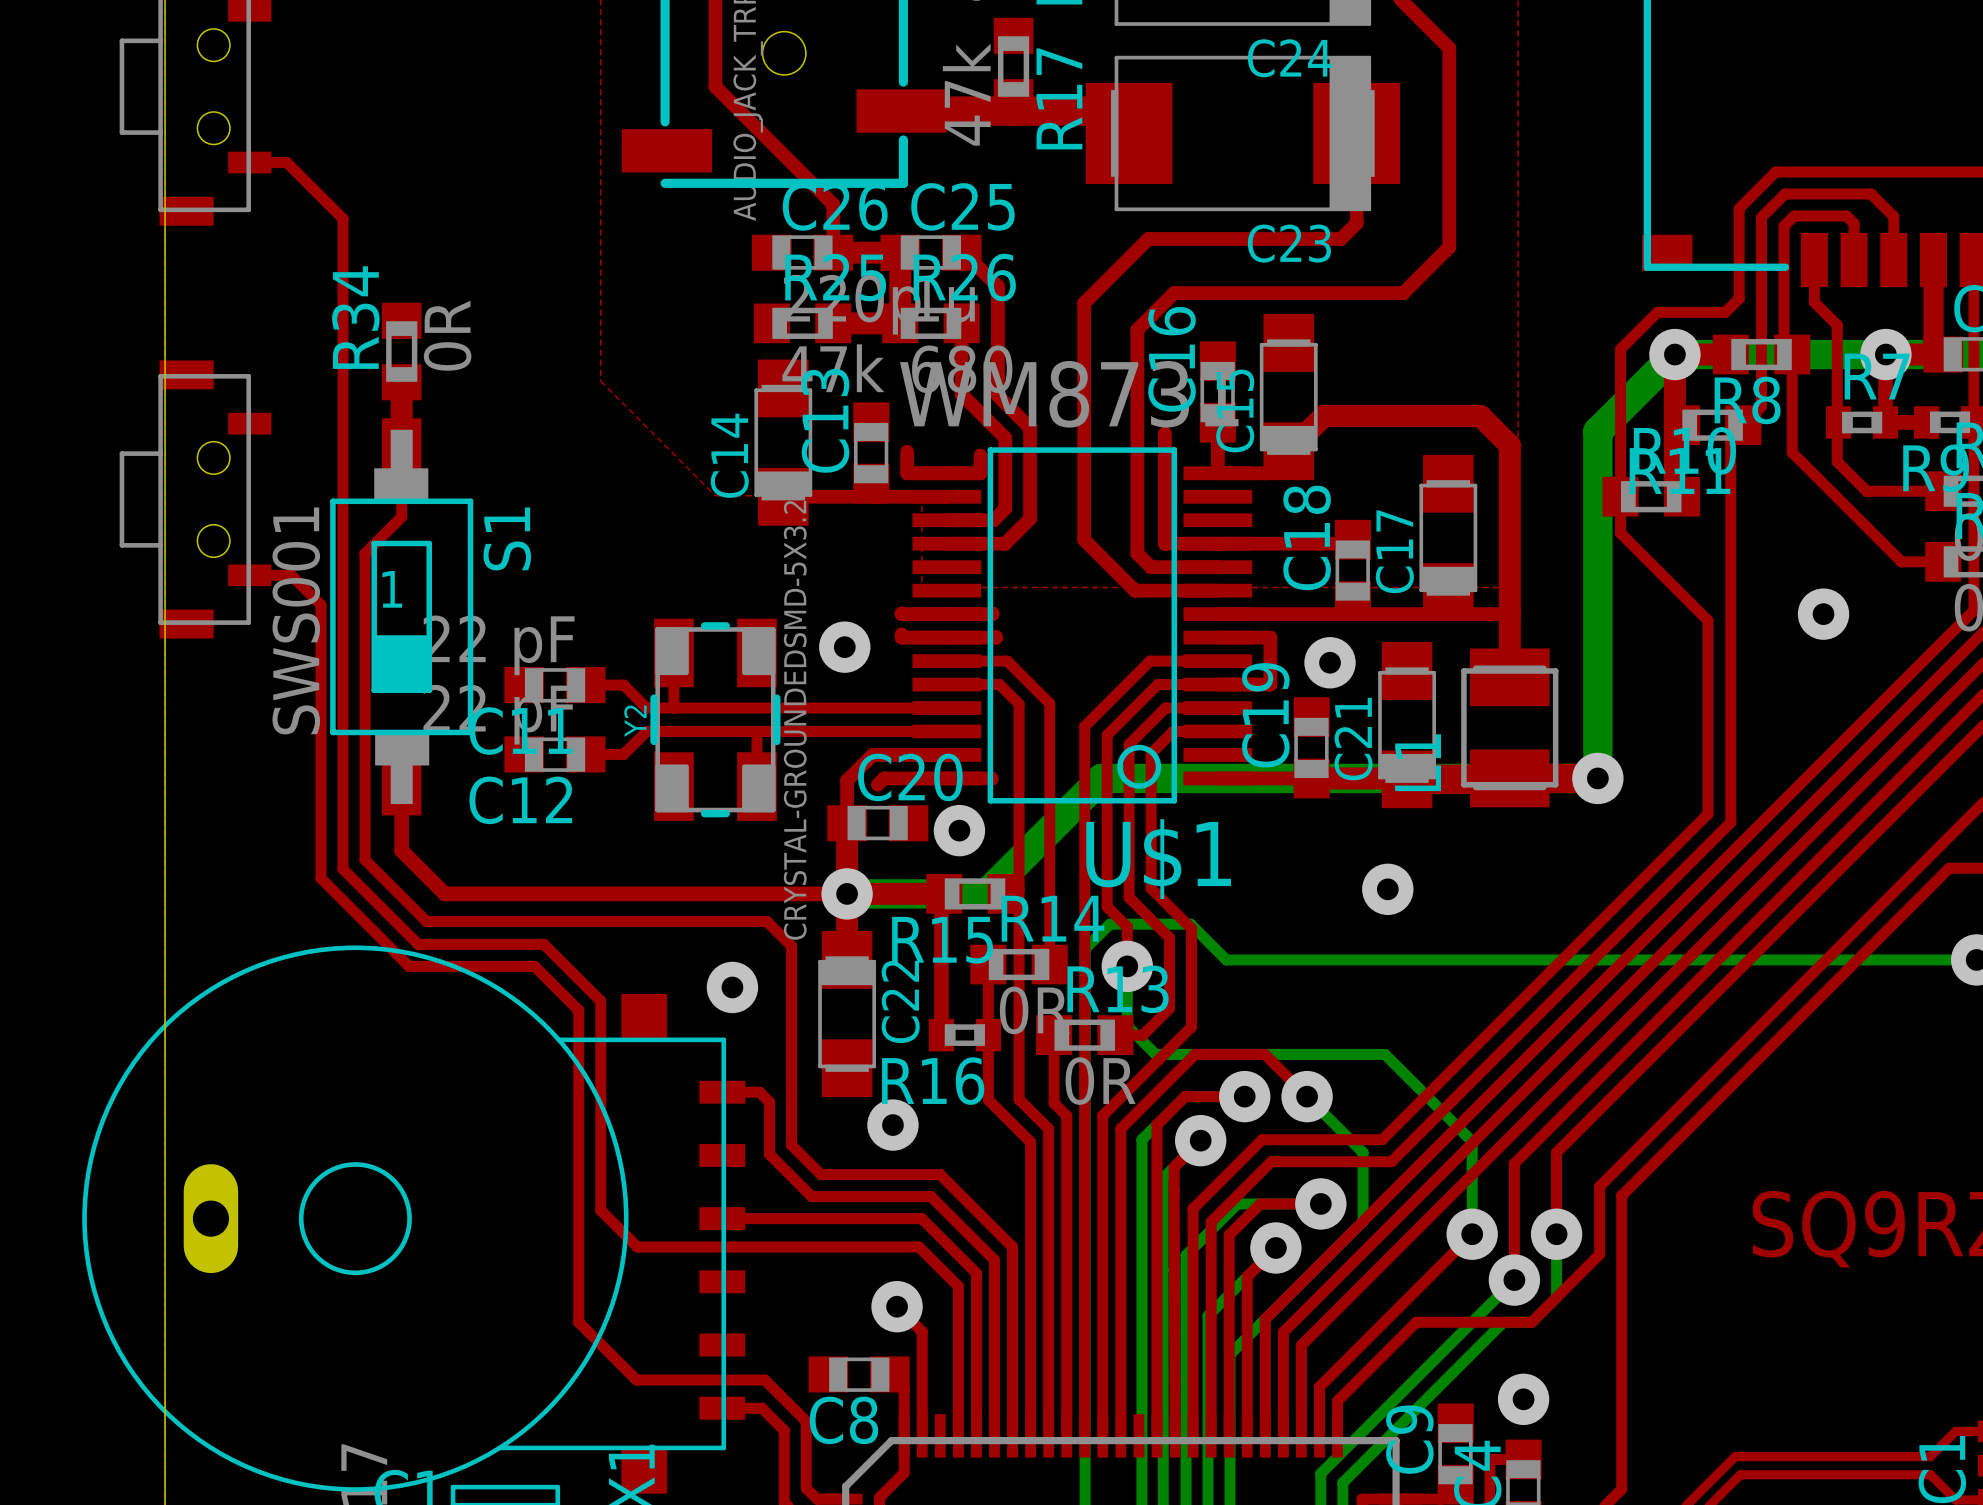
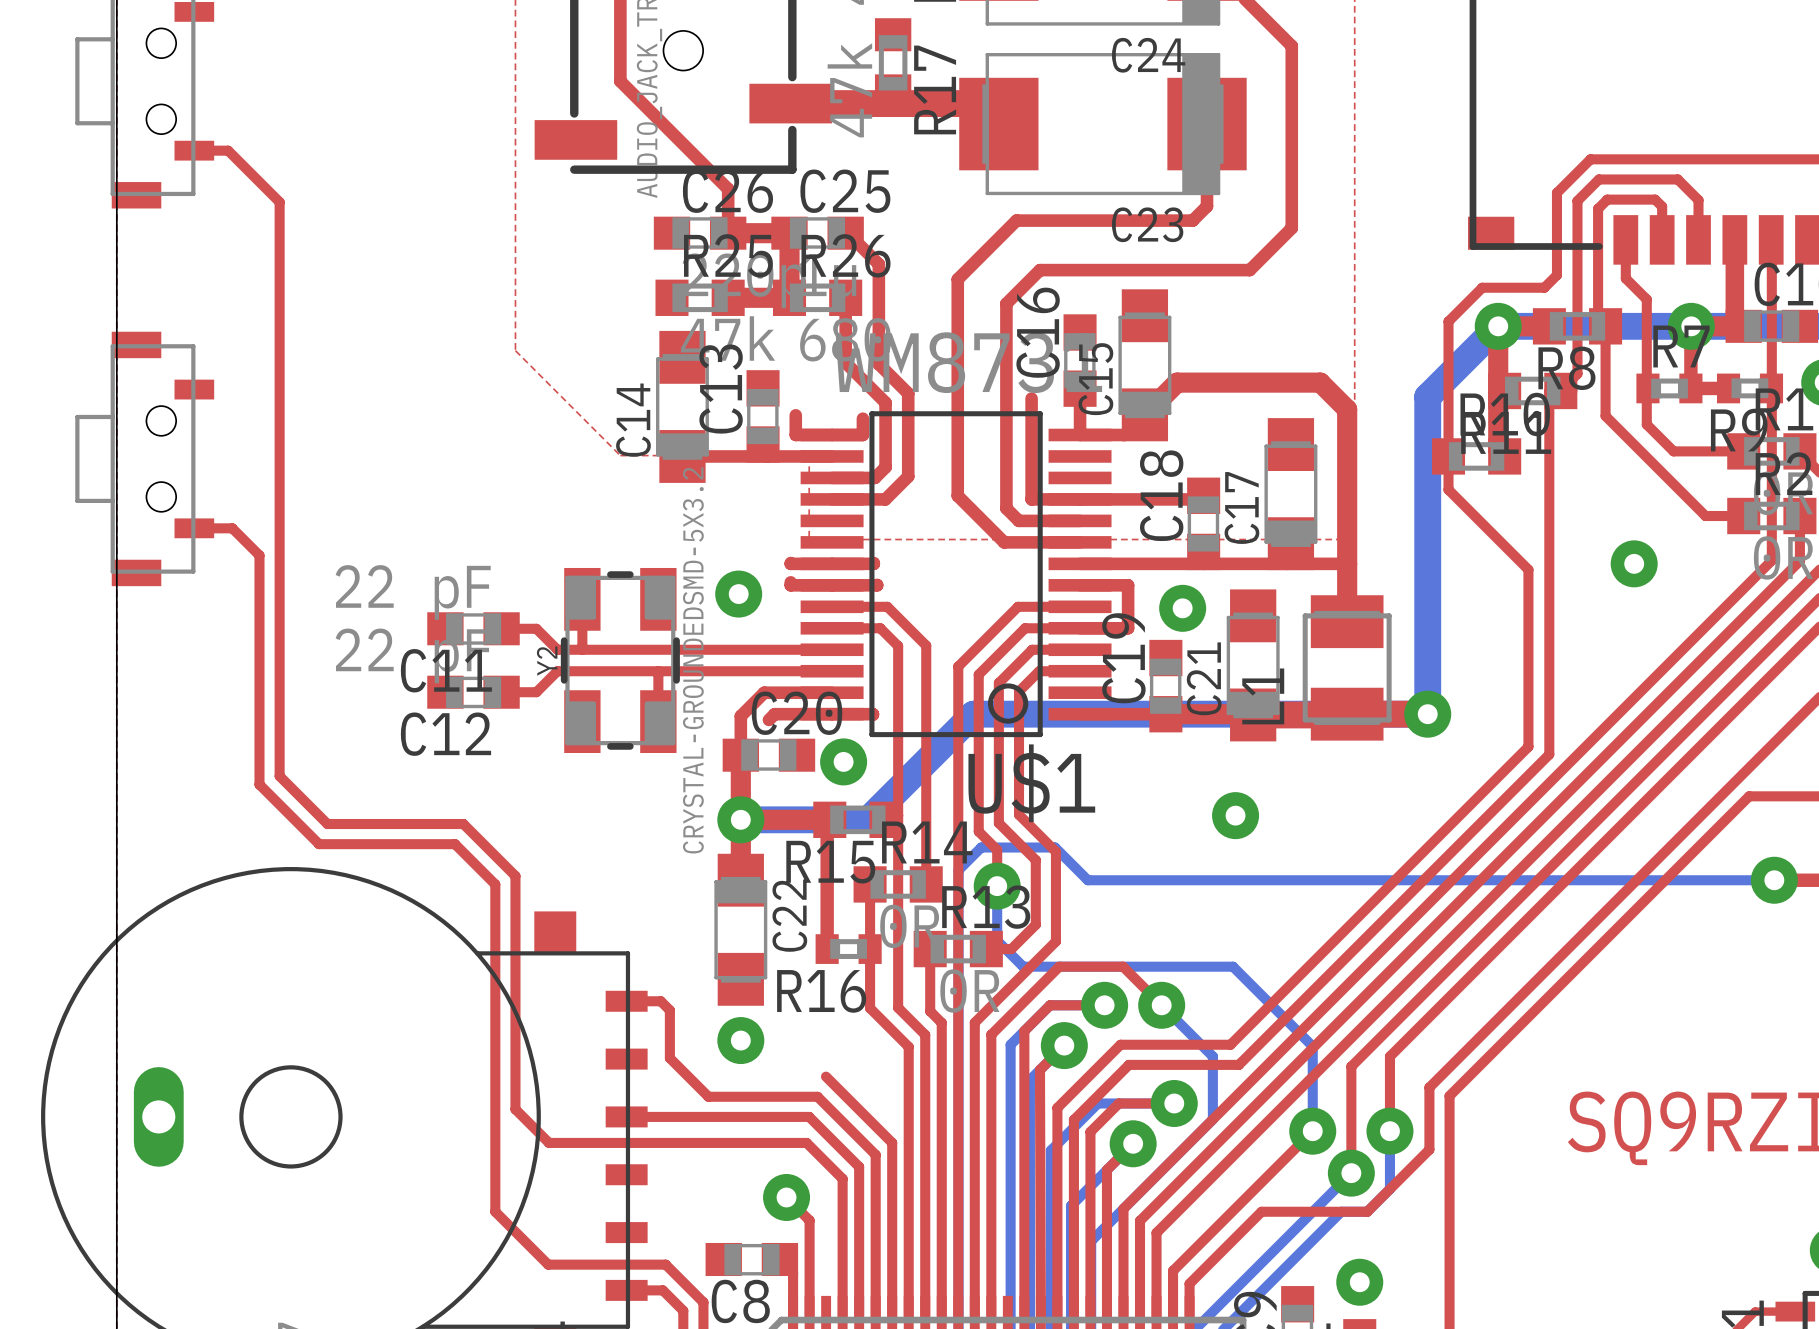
R34: 0R (401, 351) -> none
top track: (401, 382) (401, 516) (365, 553) (365, 859) (426, 921) (766, 921) (791, 946) (791, 1145) (820, 1174) (940, 1174) -> none
S1: SWS001 (401, 616) -> none
top track: (401, 779) (401, 850) (444, 893) (847, 893) -> none
top track: (343, 846) (343, 869) (418, 944) (543, 944) (600, 1001) -> (279, 776) (327, 824) (463, 824) (515, 876) (515, 918)
top track: (321, 855) (321, 878) (409, 966) (534, 966) (578, 1010) -> (259, 784) (319, 844) (455, 844) (495, 884) (495, 926)
via: (732, 987) -> none
via position: (892, 1125) -> (740, 1040)

